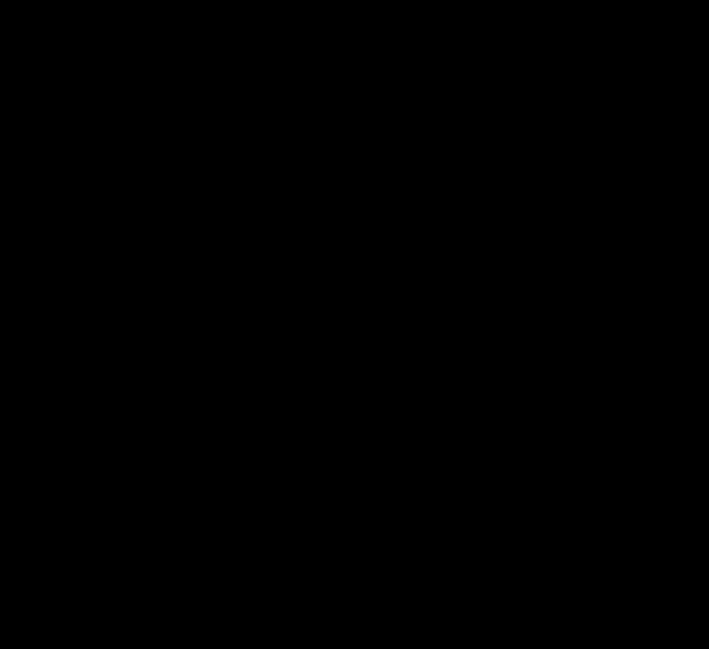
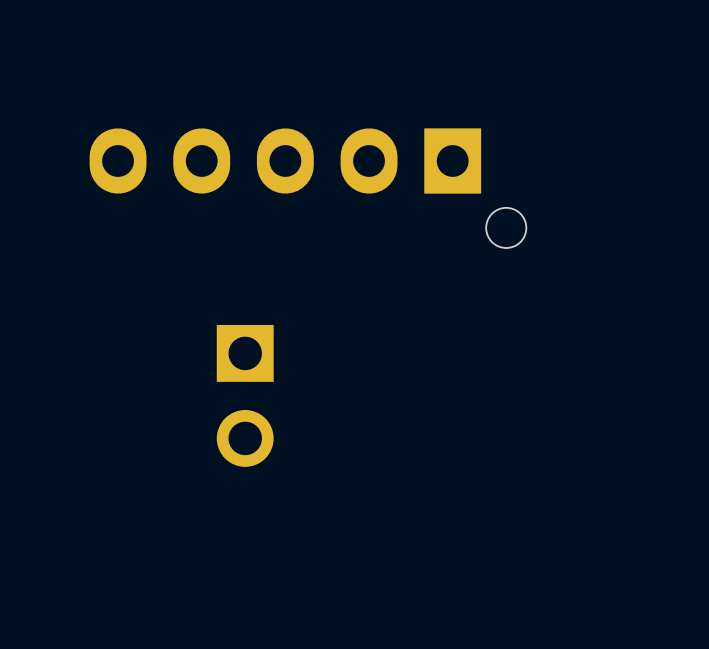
part: none -> (307, 188)
part: none -> (245, 395)

